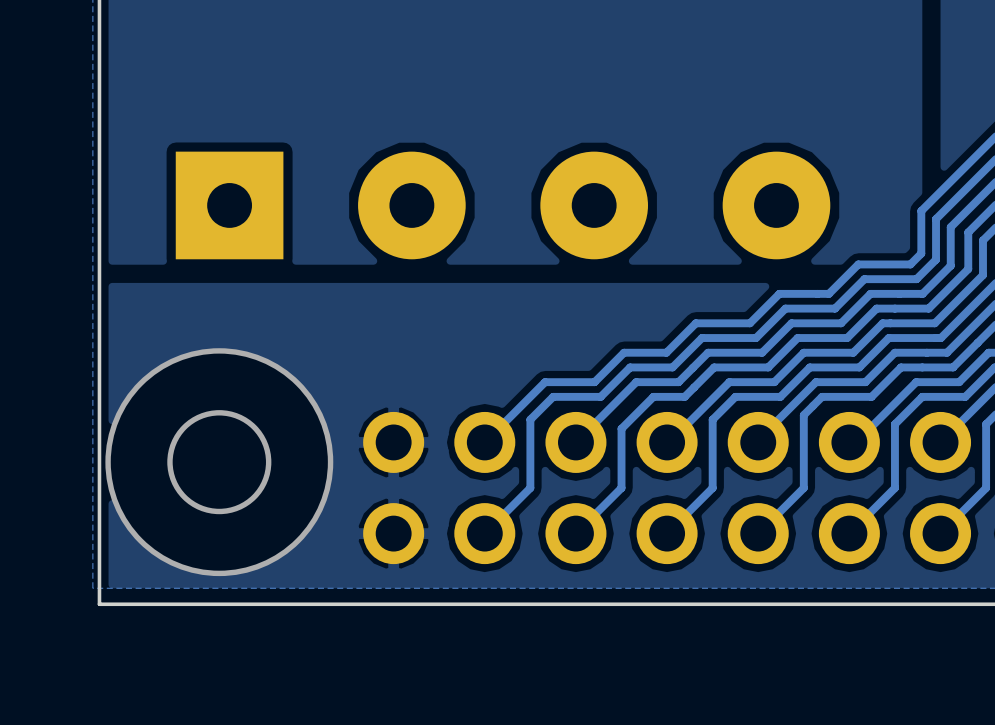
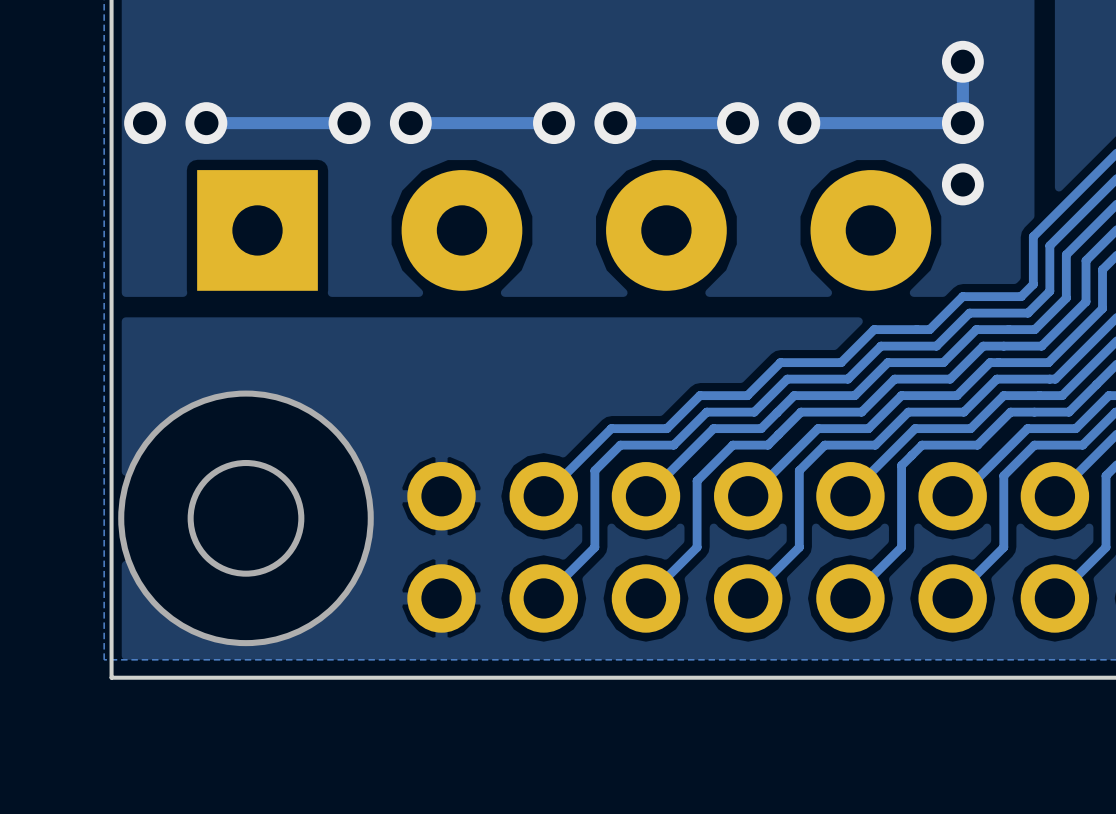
track: none -> (962, 61) (962, 123) (799, 123)
via: none -> (962, 61)
via: none -> (145, 123)
via: none -> (206, 123)
track: none -> (349, 123) (206, 123)
via: none -> (349, 123)
via: none -> (410, 123)
track: none -> (553, 123) (410, 123)
via: none -> (553, 123)
via: none -> (615, 123)
track: none -> (737, 123) (615, 123)
via: none -> (737, 123)
via: none -> (799, 123)
via: none -> (962, 123)
via: none -> (962, 184)

